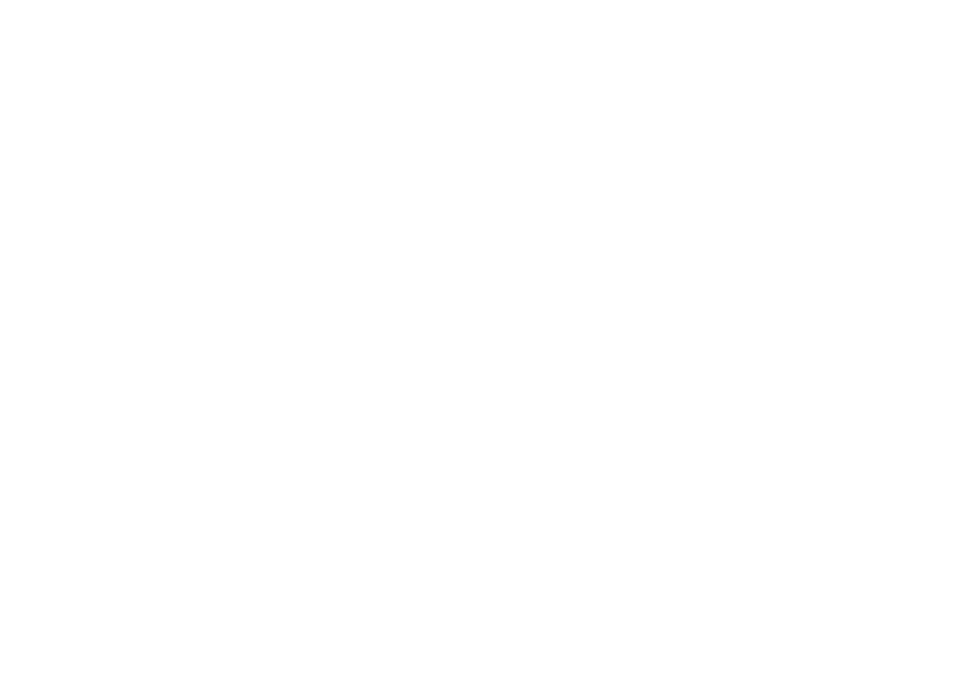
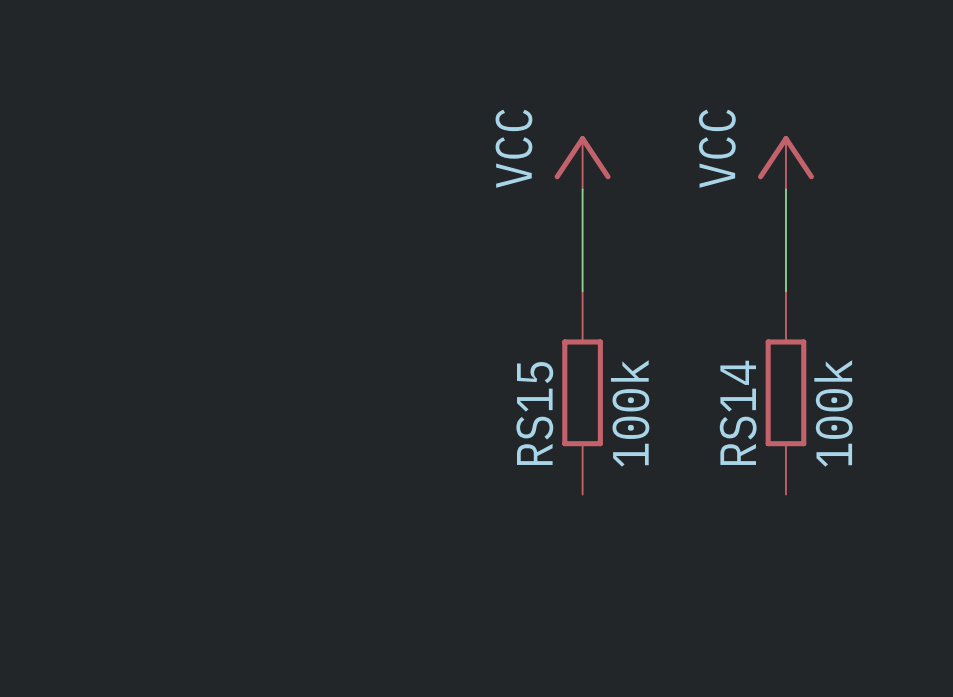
power symbol: none -> VCC (582, 162)
power symbol: none -> VCC (785, 162)
wire: none -> (582, 189) (582, 291)
wire: none -> (785, 189) (785, 291)
RS15: none -> 100k (582, 392)
RS14: none -> 100k (785, 392)

